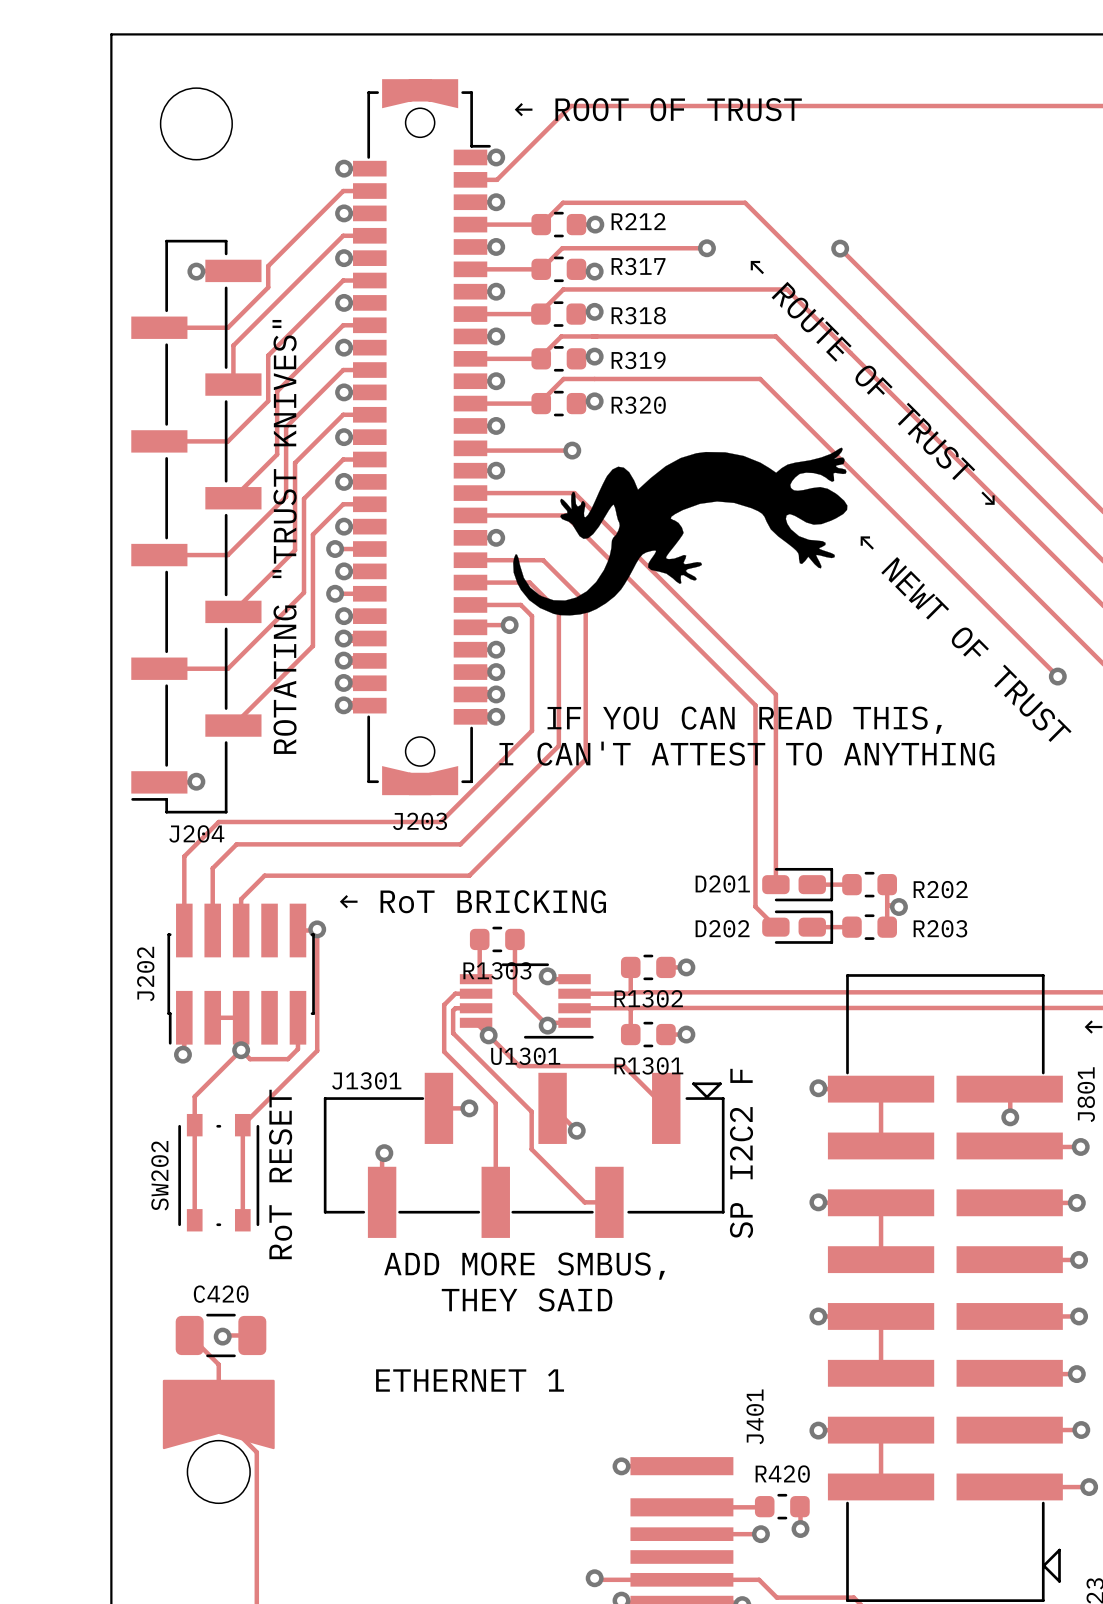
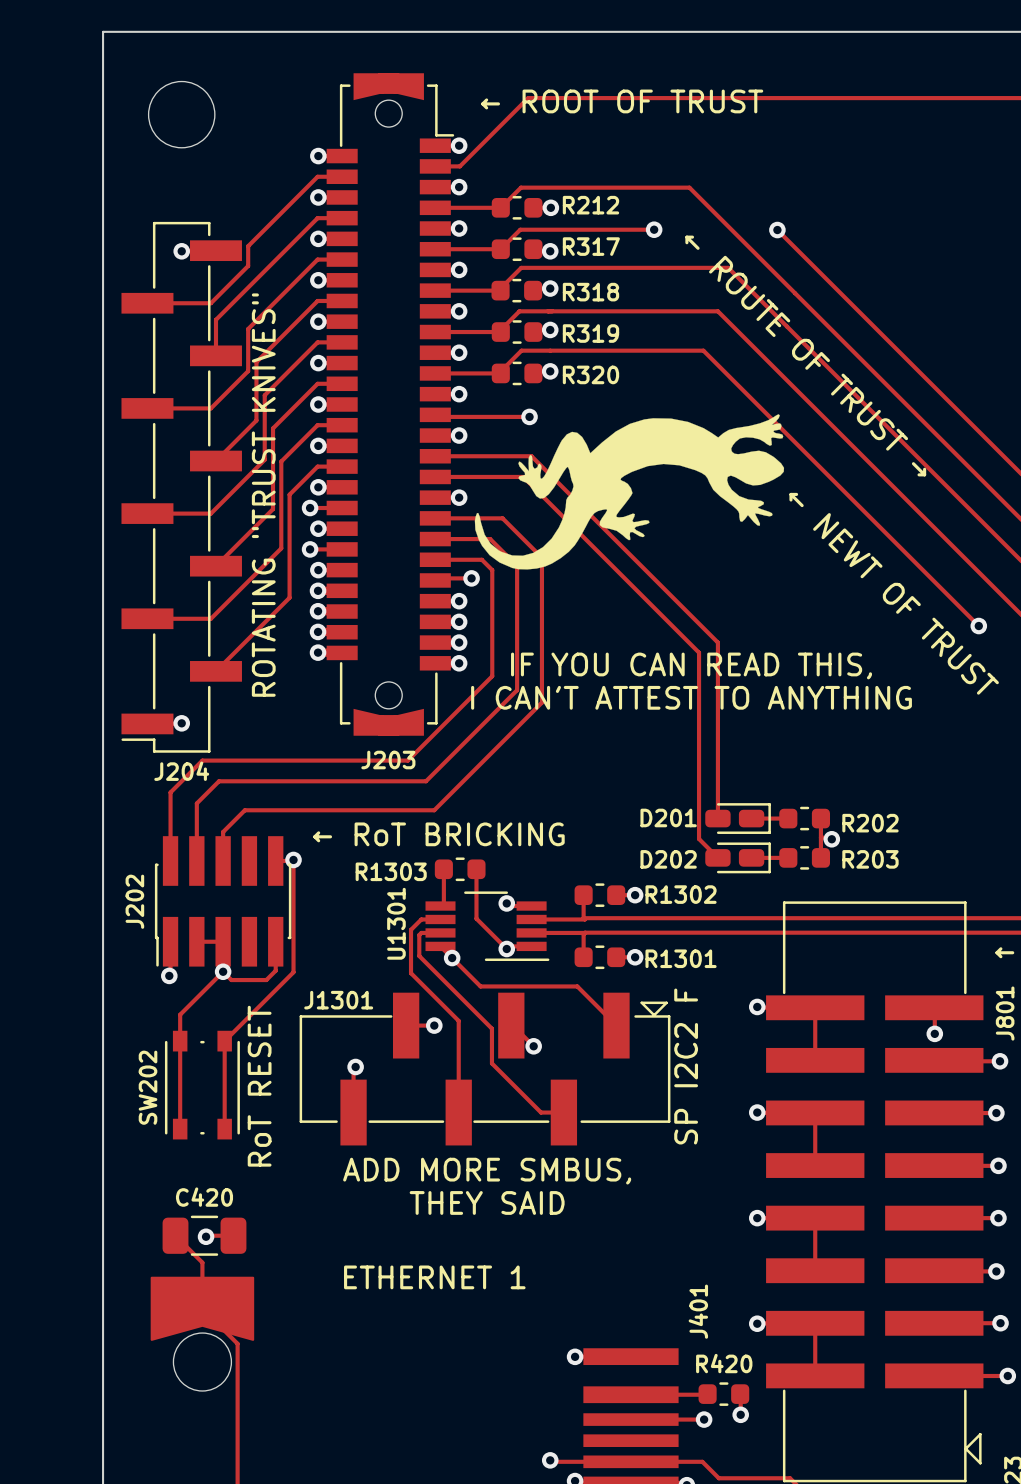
R1303 name position: R1303 (497, 970) -> R1303 (391, 871)
R1302 name position: R1302 (648, 998) -> R1302 (681, 894)
U1301 name rotation: 0° (525, 1056) -> 90° counterclockwise (396, 923)
U1301 name position: U1301 (525, 1056) -> U1301 (396, 923)
R1301 name position: R1301 (648, 1065) -> R1301 (681, 958)

